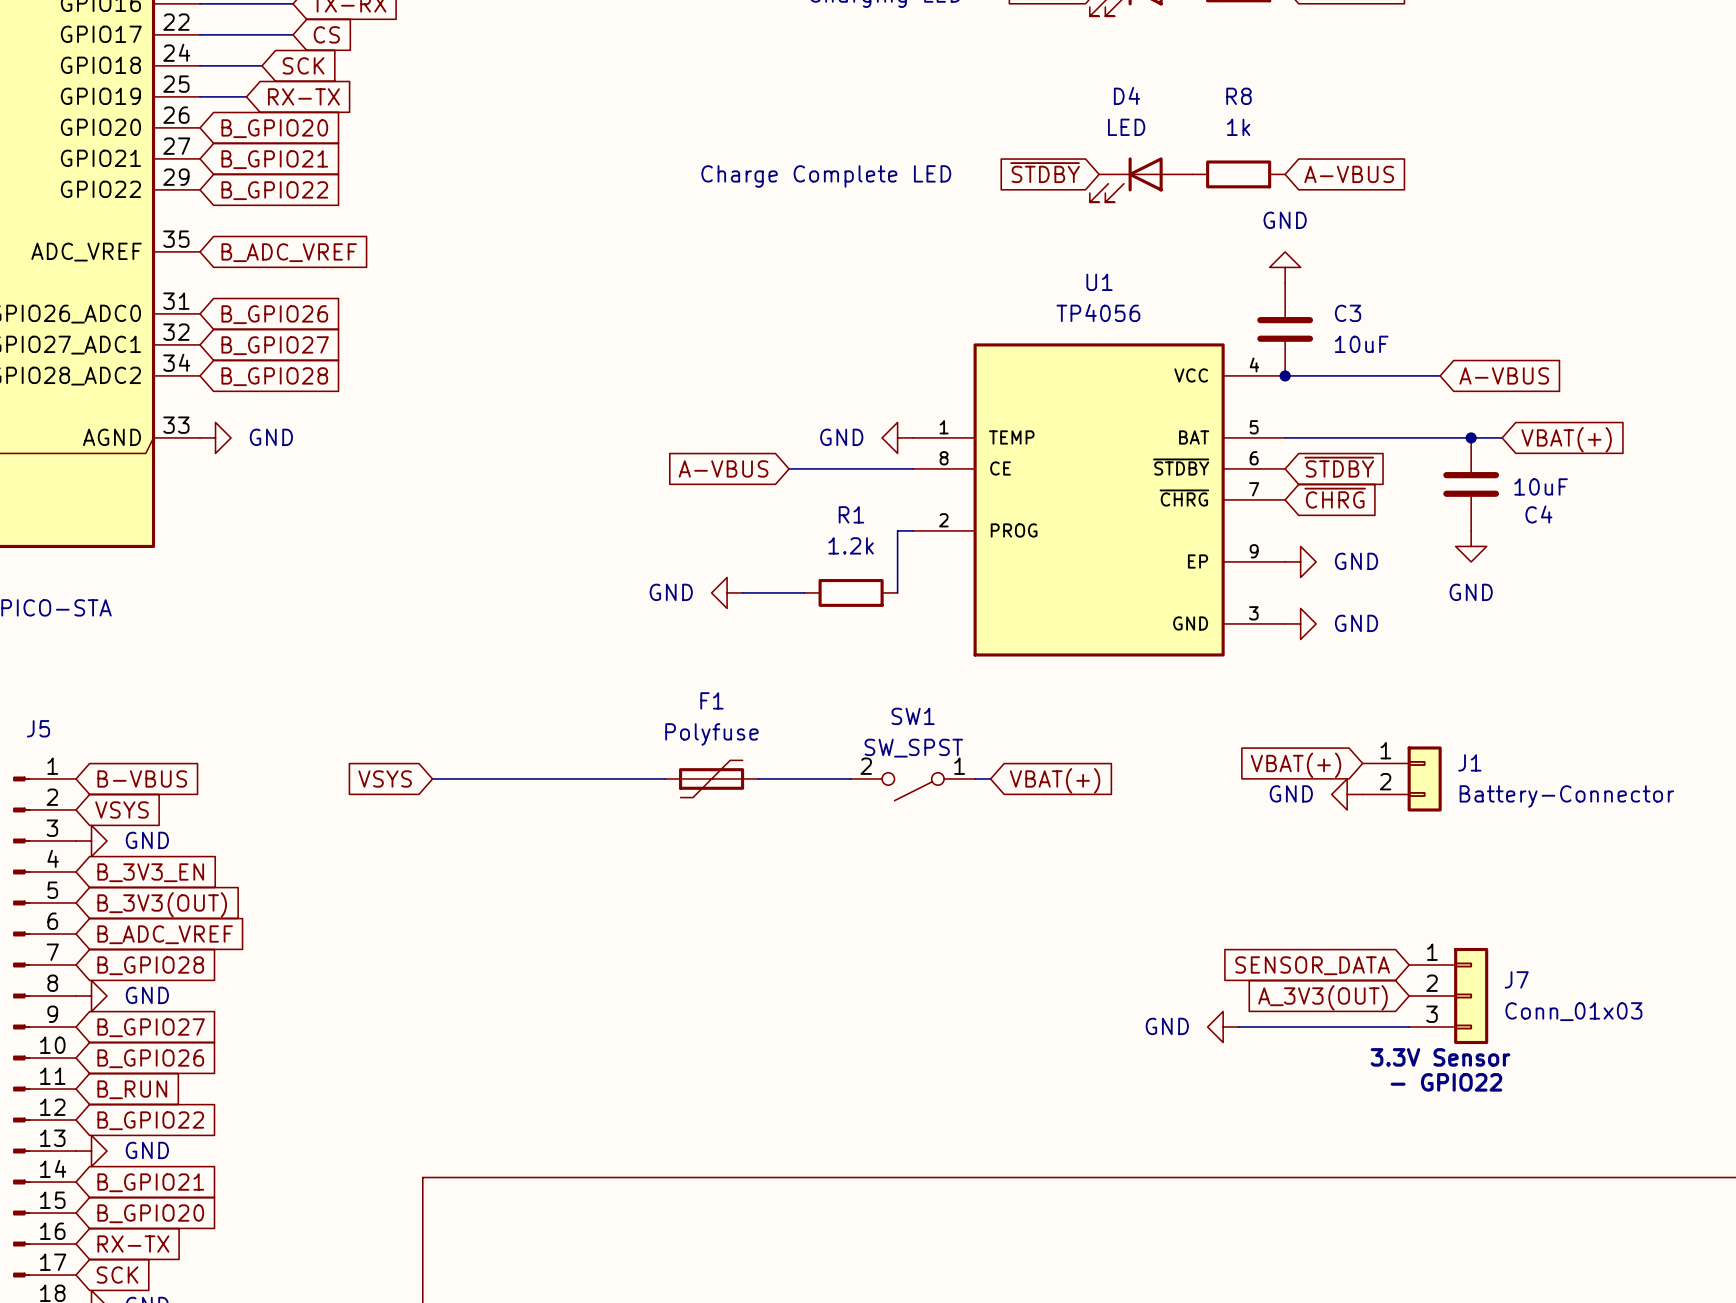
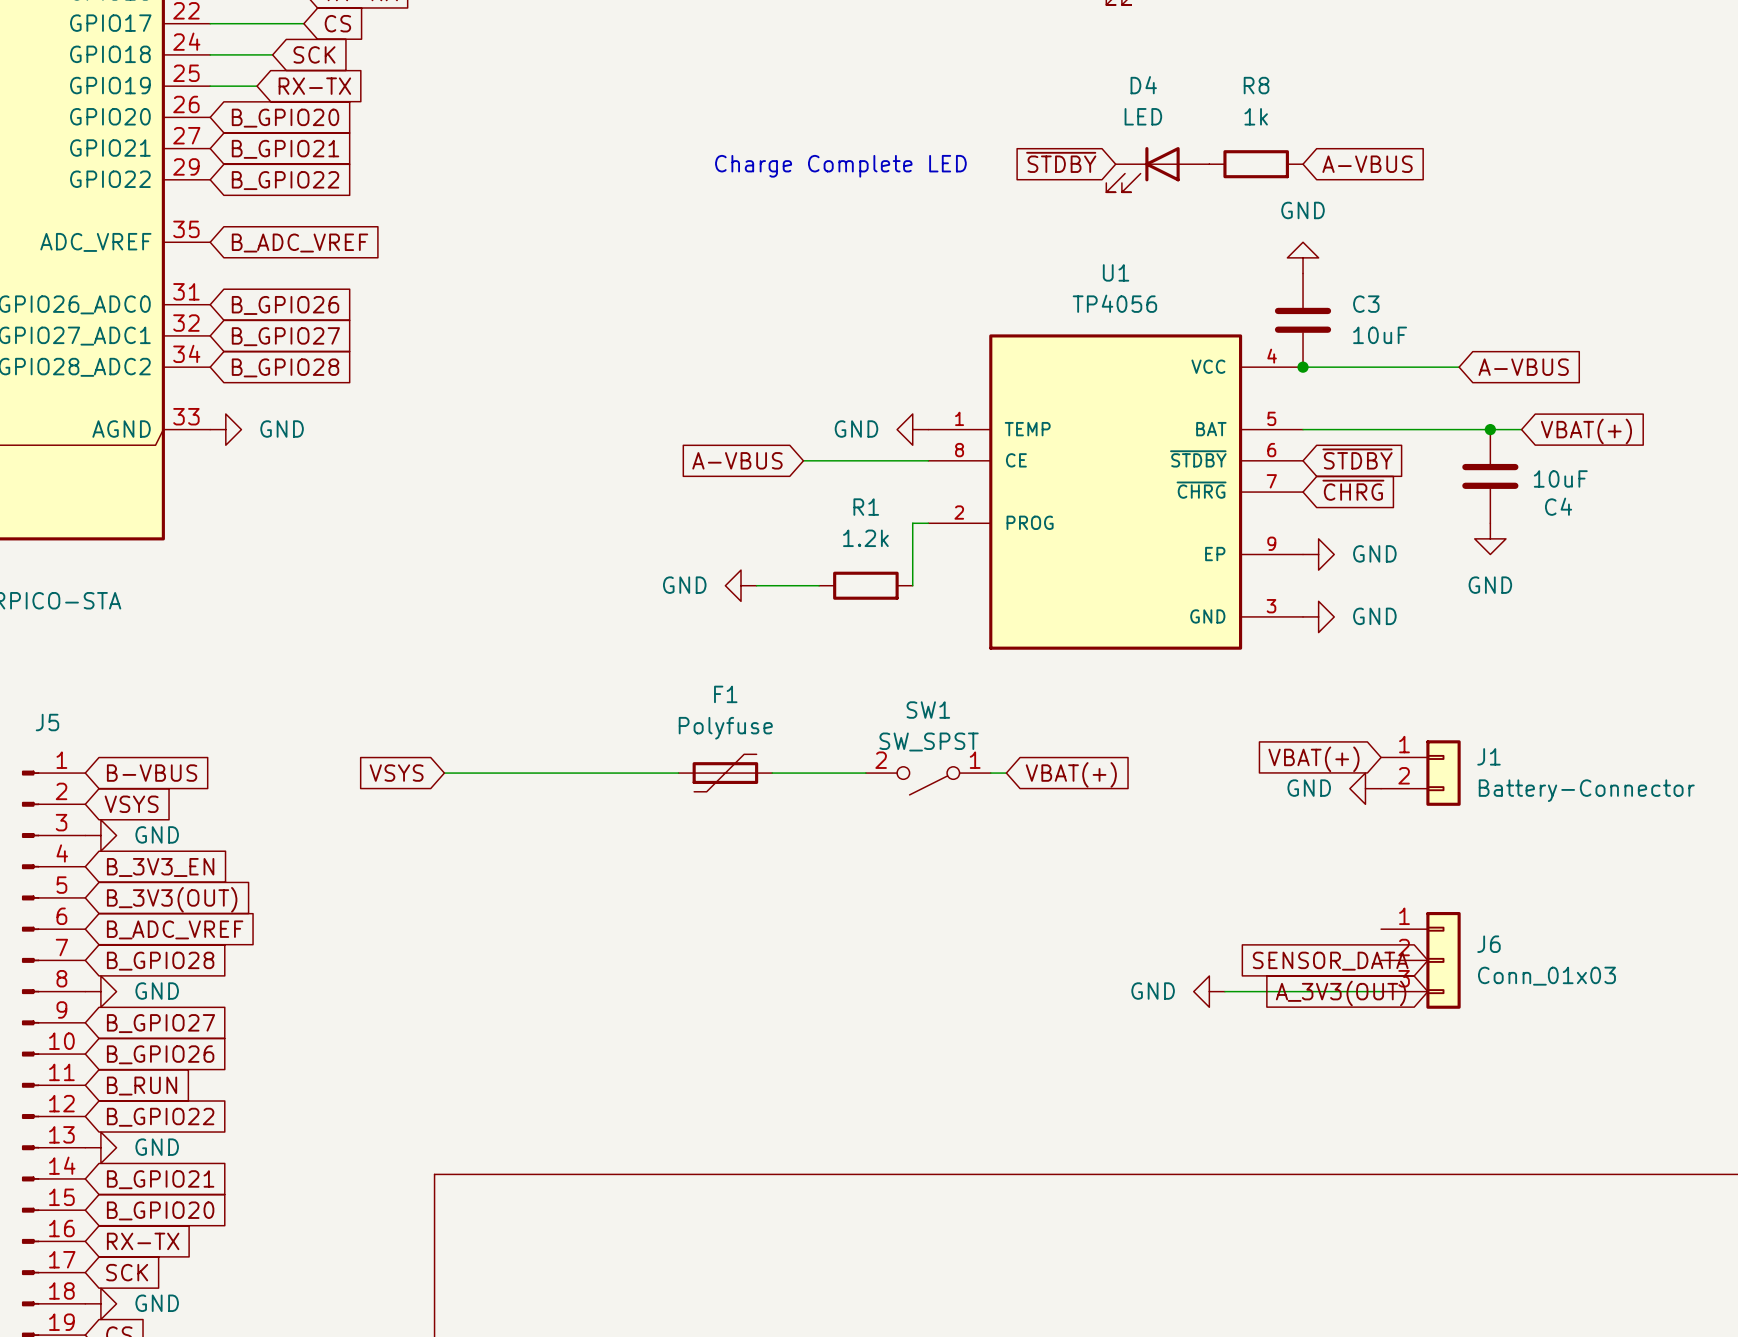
J6: none -> Conn_01x03 (1420, 960)
wire: none -> (1224, 991) (1381, 991)
J7: Conn_01x03 (1448, 996) -> none
power symbol position: GND (1223, 1027) -> GND (1209, 991)
wire: (1238, 1027) (1409, 1027) -> none
text: 3.3V Sensor (1440, 1057) -> none
text: - GPIO22 (1446, 1082) -> none

